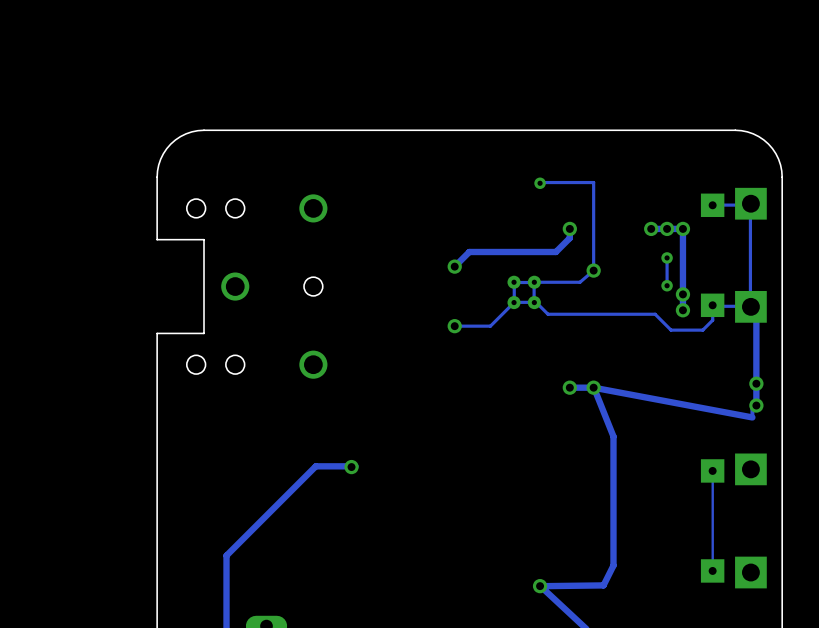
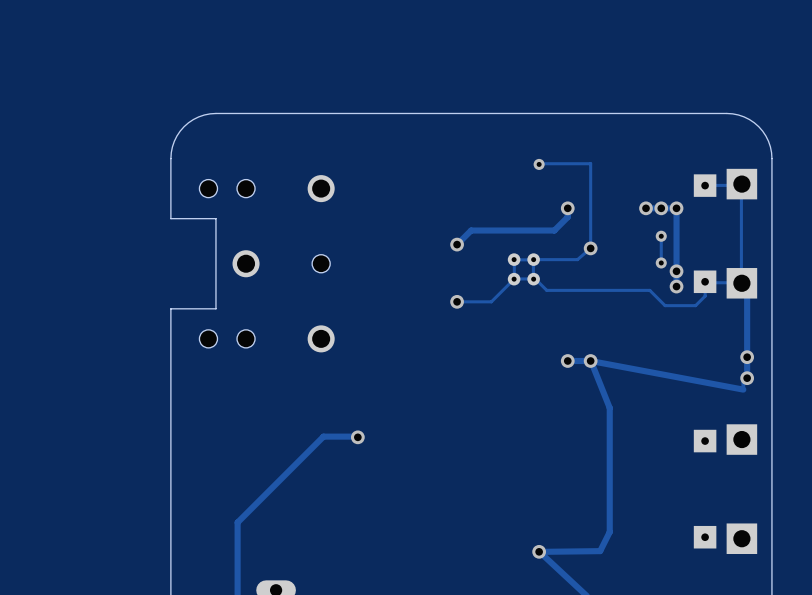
track: (712, 470) (712, 570) -> none

